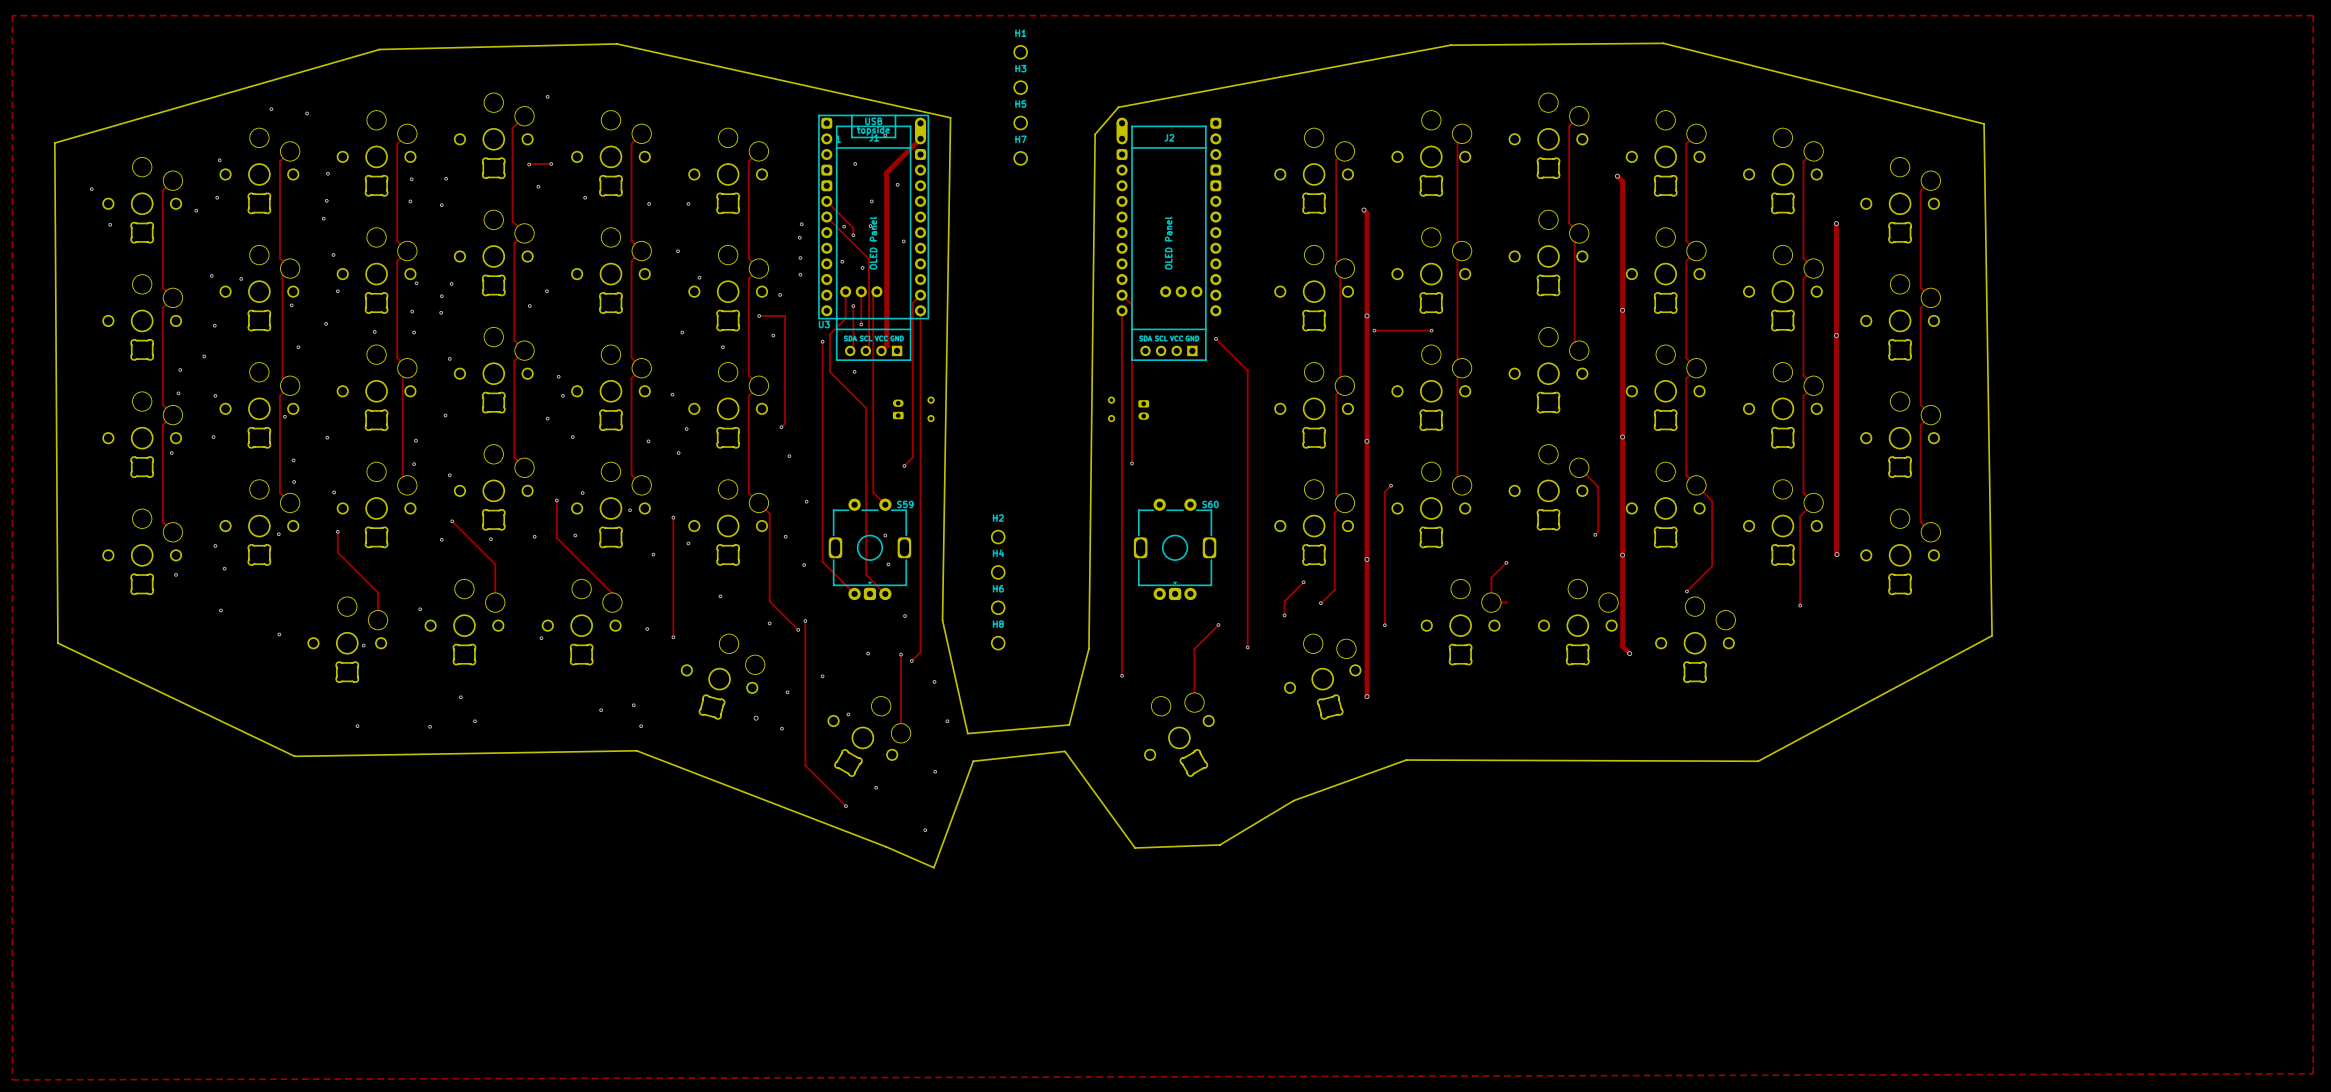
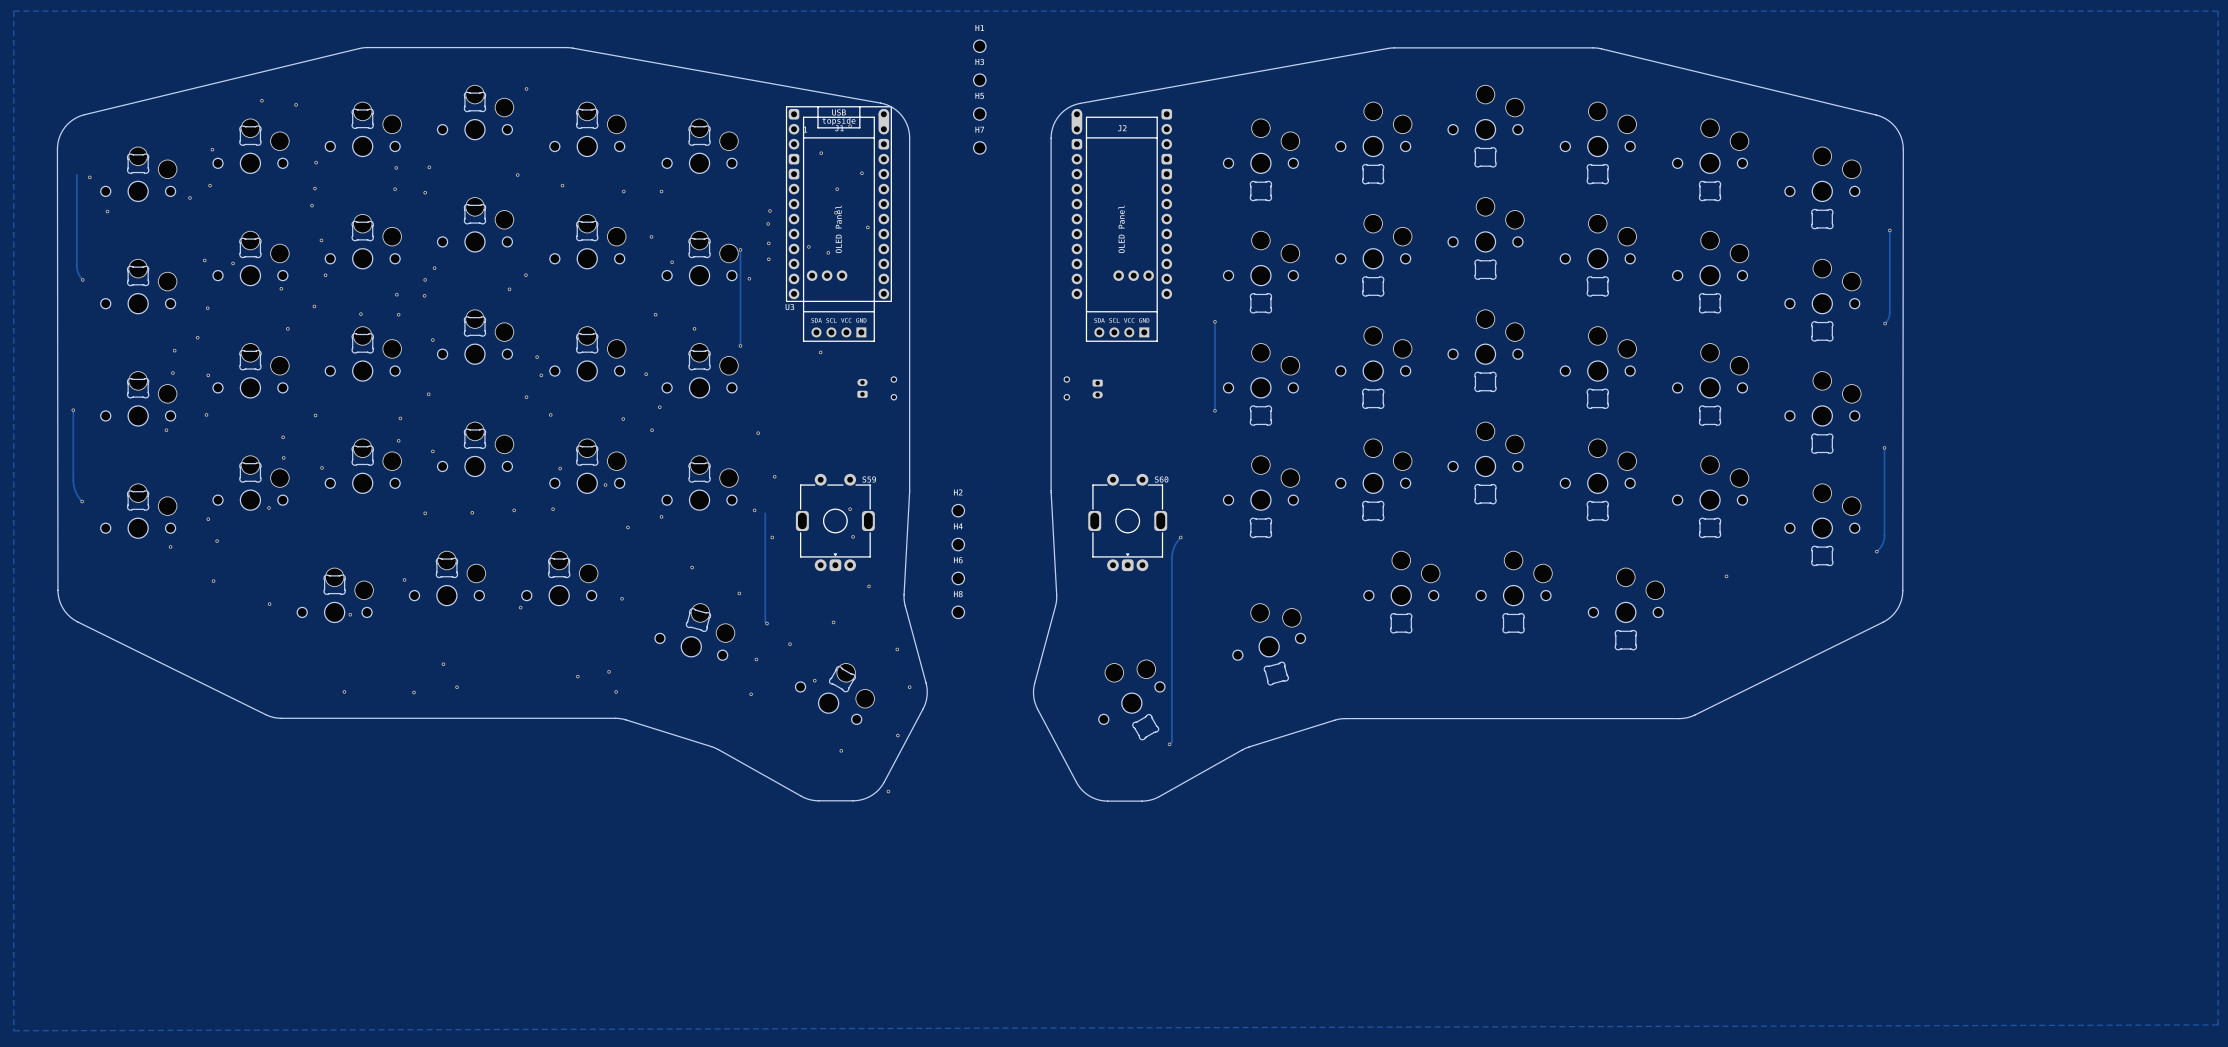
board edge: (1663, 43) (1450, 45) (1118, 107) (1095, 134) (1088, 648) (1069, 724) (967, 733) (942, 620) (950, 117) (617, 43) (379, 49) (54, 143) (57, 643) (294, 756) (636, 750) (885, 846) (933, 867) (973, 761) (1064, 751) (1135, 848) (1219, 844) (1293, 800) (1406, 760) (1758, 761) (1992, 635) (1984, 123) (1663, 43) -> none
board edge: none -> (367, 47) (569, 47) (880, 103) (893, 108) (903, 118) (908, 127) (909, 137) (909, 490) (904, 597) (927, 692) (923, 708) (884, 782) (873, 793) (856, 800) (809, 799) (715, 747) (620, 718) (273, 717) (77, 621) (63, 608) (57, 590) (57, 149) (61, 132) (72, 120) (84, 114) (367, 47)
board edge: none -> (1394, 47) (1599, 48) (1876, 115) (1893, 124) (1900, 136) (1903, 149) (1902, 590) (1900, 603) (1893, 614) (1883, 622) (1687, 717) (1339, 719) (1245, 748) (1153, 799) (1145, 800) (1107, 801) (1095, 798) (1084, 792) (1076, 782) (1037, 709) (1033, 693) (1056, 597) (1051, 490) (1051, 138) (1053, 124) (1064, 110) (1080, 103) (1394, 47)
part: none -> (474, 101)
track: (524, 116) (512, 128) (512, 221) (524, 233) (514, 243) (514, 340) (524, 350) (514, 360) (514, 457) (524, 467) -> none
track: (1579, 116) (1569, 126) (1569, 223) (1579, 233) (1574, 238) (1574, 346) (1579, 350) -> none
part: none -> (362, 118)
part: none -> (587, 118)
track: (407, 133) (397, 143) (397, 240) (407, 251) (397, 261) (397, 358) (407, 368) (402, 372) (402, 480) (407, 485) -> none
track: (641, 133) (631, 143) (631, 240) (641, 251) (631, 261) (631, 358) (641, 368) (631, 378) (631, 475) (642, 485) -> none
track: (1462, 133) (1457, 138) (1457, 246) (1462, 251) (1457, 255) (1457, 363) (1462, 368) (1457, 372) (1457, 480) (1462, 485) -> none
track: (1696, 133) (1686, 143) (1686, 240) (1696, 251) (1686, 261) (1686, 358) (1696, 368) (1686, 378) (1686, 475) (1712, 501) (1712, 566) (1686, 591) -> none
track: (920, 138) (886, 172) (886, 345) (881, 350) -> none
part: none -> (250, 135)
part: none -> (699, 135)
track: (290, 151) (279, 161) (279, 258) (290, 268) (282, 276) (282, 378) (290, 385) (279, 395) (279, 492) (290, 502) -> none
track: (758, 151) (748, 161) (748, 258) (758, 268) (748, 278) (748, 375) (758, 385) (748, 395) (748, 492) (769, 513) (769, 601) (798, 629) -> none
track: (1344, 151) (1336, 160) (1336, 259) (1344, 268) (1340, 273) (1340, 381) (1344, 385) (1336, 394) (1336, 494) (1344, 502) (1334, 513) (1334, 589) (1320, 603) -> none
track: (1813, 151) (1803, 161) (1803, 258) (1813, 268) (1803, 278) (1803, 375) (1813, 385) (1803, 395) (1803, 492) (1813, 502) (1800, 516) (1800, 605) -> none
track: (551, 163) (529, 164) -> none
via: (551, 163) -> none
via: (529, 164) -> none
part: (493, 168) -> none
part: none -> (138, 163)
track: (1617, 176) (1622, 181) (1622, 646) (1629, 653) -> none
via: (1617, 176) -> none
track: (172, 180) (162, 190) (162, 287) (172, 297) (162, 308) (162, 404) (172, 415) (162, 425) (162, 522) (172, 532) -> none
track: (1930, 180) (1920, 190) (1920, 287) (1930, 297) (1920, 308) (1920, 404) (1930, 415) (1920, 425) (1920, 522) (1930, 532) -> none
part: (376, 185) -> none
part: (610, 185) -> none
track: none -> (76, 175) (76, 265) (78, 273) (82, 279)
track: (826, 201) (853, 227) (853, 235) -> none
part: (259, 203) -> none
part: (728, 203) -> none
track: (1363, 210) (1367, 213) (1367, 696) -> none
via: (1363, 210) -> none
track: (826, 217) (869, 259) (869, 347) (865, 350) -> none
track: (1836, 223) (1837, 554) -> none
via: (1836, 223) -> none
via: (844, 226) -> none
part: none -> (474, 214)
part: (142, 232) -> none
via: (853, 235) -> none
track: none -> (1889, 230) (1889, 313) (1885, 323)
via: none -> (1889, 230)
part: none -> (362, 231)
part: none -> (587, 231)
part: none -> (250, 247)
part: none -> (699, 247)
track: none -> (740, 249) (740, 345)
via: none -> (740, 249)
via: (416, 283) -> none
part: (493, 285) -> none
track: (845, 291) (845, 318) (829, 334) (829, 371) (866, 408) (866, 574) (885, 593) -> none
track: (861, 291) (861, 324) -> none
track: (876, 291) (873, 295) (873, 492) (885, 504) -> none
part: none -> (138, 275)
track: (920, 295) (912, 302) (912, 457) (904, 465) -> none
track: (1122, 295) (1132, 305) (1132, 463) -> none
via: none -> (82, 279)
part: (376, 302) -> none
part: (610, 302) -> none
track: (853, 306) (853, 347) (850, 350) -> none
via: (853, 306) -> none
track: (920, 310) (920, 652) (911, 660) -> none
track: (1122, 310) (1122, 675) -> none
via: (1622, 310) -> none
track: (759, 315) (785, 315) (785, 423) (781, 427) -> none
via: (759, 315) -> none
via: (1367, 315) -> none
part: (259, 320) -> none
part: (728, 320) -> none
via: (861, 324) -> none
track: (1374, 330) (1431, 330) -> none
via: (1374, 330) -> none
via: (1431, 330) -> none
via: (773, 335) -> none
via: (1836, 335) -> none
track: (1216, 338) (1247, 370) (1247, 647) -> none
via: (1216, 338) -> none
track: none -> (1214, 321) (1214, 410)
via: none -> (1214, 321)
track: (822, 341) (822, 561) (854, 593) -> none
via: (822, 341) -> none
via: none -> (1885, 323)
part: none -> (474, 326)
part: (142, 349) -> none
part: none -> (362, 343)
part: none -> (587, 343)
via: none -> (740, 345)
part: none -> (250, 360)
part: none -> (699, 360)
part: (493, 402) -> none
part: none -> (138, 388)
via: (284, 416) -> none
part: (376, 420) -> none
part: (610, 420) -> none
via: (781, 427) -> none
track: none -> (73, 410) (73, 483) (76, 494) (82, 501)
via: none -> (73, 410)
via: none -> (1214, 410)
part: (259, 437) -> none
part: (728, 437) -> none
via: (1622, 437) -> none
via: (1367, 441) -> none
part: none -> (474, 438)
via: (1132, 463) -> none
via: (904, 465) -> none
part: (142, 467) -> none
track: none -> (1884, 447) (1884, 537) (1882, 545) (1876, 551)
via: none -> (1884, 447)
track: (1573, 473) (1579, 467) (1598, 486) (1598, 531) (1595, 534) -> none
part: none -> (362, 455)
part: none -> (587, 455)
track: (1391, 485) (1384, 491) (1384, 625) -> none
via: (1391, 485) -> none
part: none -> (250, 472)
part: none -> (699, 472)
track: (556, 500) (556, 537) (612, 593) (612, 602) -> none
via: (556, 500) -> none
track: (673, 516) (673, 637) -> none
via: (673, 517) -> none
part: (493, 519) -> none
track: (452, 521) (495, 564) (495, 602) -> none
via: (452, 521) -> none
part: none -> (138, 500)
via: none -> (82, 501)
track: (337, 531) (337, 552) (378, 592) (378, 620) -> none
via: (337, 531) -> none
via: (1595, 534) -> none
part: (376, 537) -> none
part: (610, 537) -> none
track: none -> (765, 513) (765, 621) (767, 623)
part: (259, 554) -> none
part: (728, 554) -> none
via: (1837, 554) -> none
via: (1622, 555) -> none
via: (1367, 559) -> none
track: (1506, 562) (1491, 577) (1491, 602) (1507, 602) -> none
via: (1506, 562) -> none
track: none -> (1180, 537) (1174, 547) (1172, 555) (1171, 742) (1169, 744)
via: none -> (1180, 537)
via: none -> (1876, 551)
track: (1303, 582) (1284, 601) (1284, 615) -> none
via: (1303, 582) -> none
part: (142, 584) -> none
via: (1686, 591) -> none
part: none -> (446, 567)
part: none -> (559, 567)
via: (1320, 603) -> none
part: none -> (334, 584)
via: (1284, 615) -> none
track: (805, 621) (805, 765) (845, 806) -> none
via: (805, 621) -> none
track: (1218, 625) (1194, 648) (1194, 702) -> none
via: (1218, 625) -> none
via: (1384, 625) -> none
via: (798, 629) -> none
via: (673, 637) -> none
via: (1247, 647) -> none
via: (1629, 653) -> none
part: (464, 654) -> none
part: (581, 654) -> none
via: none -> (767, 623)
track: (901, 654) (901, 733) -> none
via: (901, 654) -> none
via: (911, 660) -> none
part: (347, 672) -> none
via: (1122, 675) -> none
via: (1367, 696) -> none
part position: (712, 707) -> (698, 620)
via: (756, 718) -> none
part position: (848, 762) -> (842, 679)
via: none -> (1169, 744)
via: (845, 806) -> none

